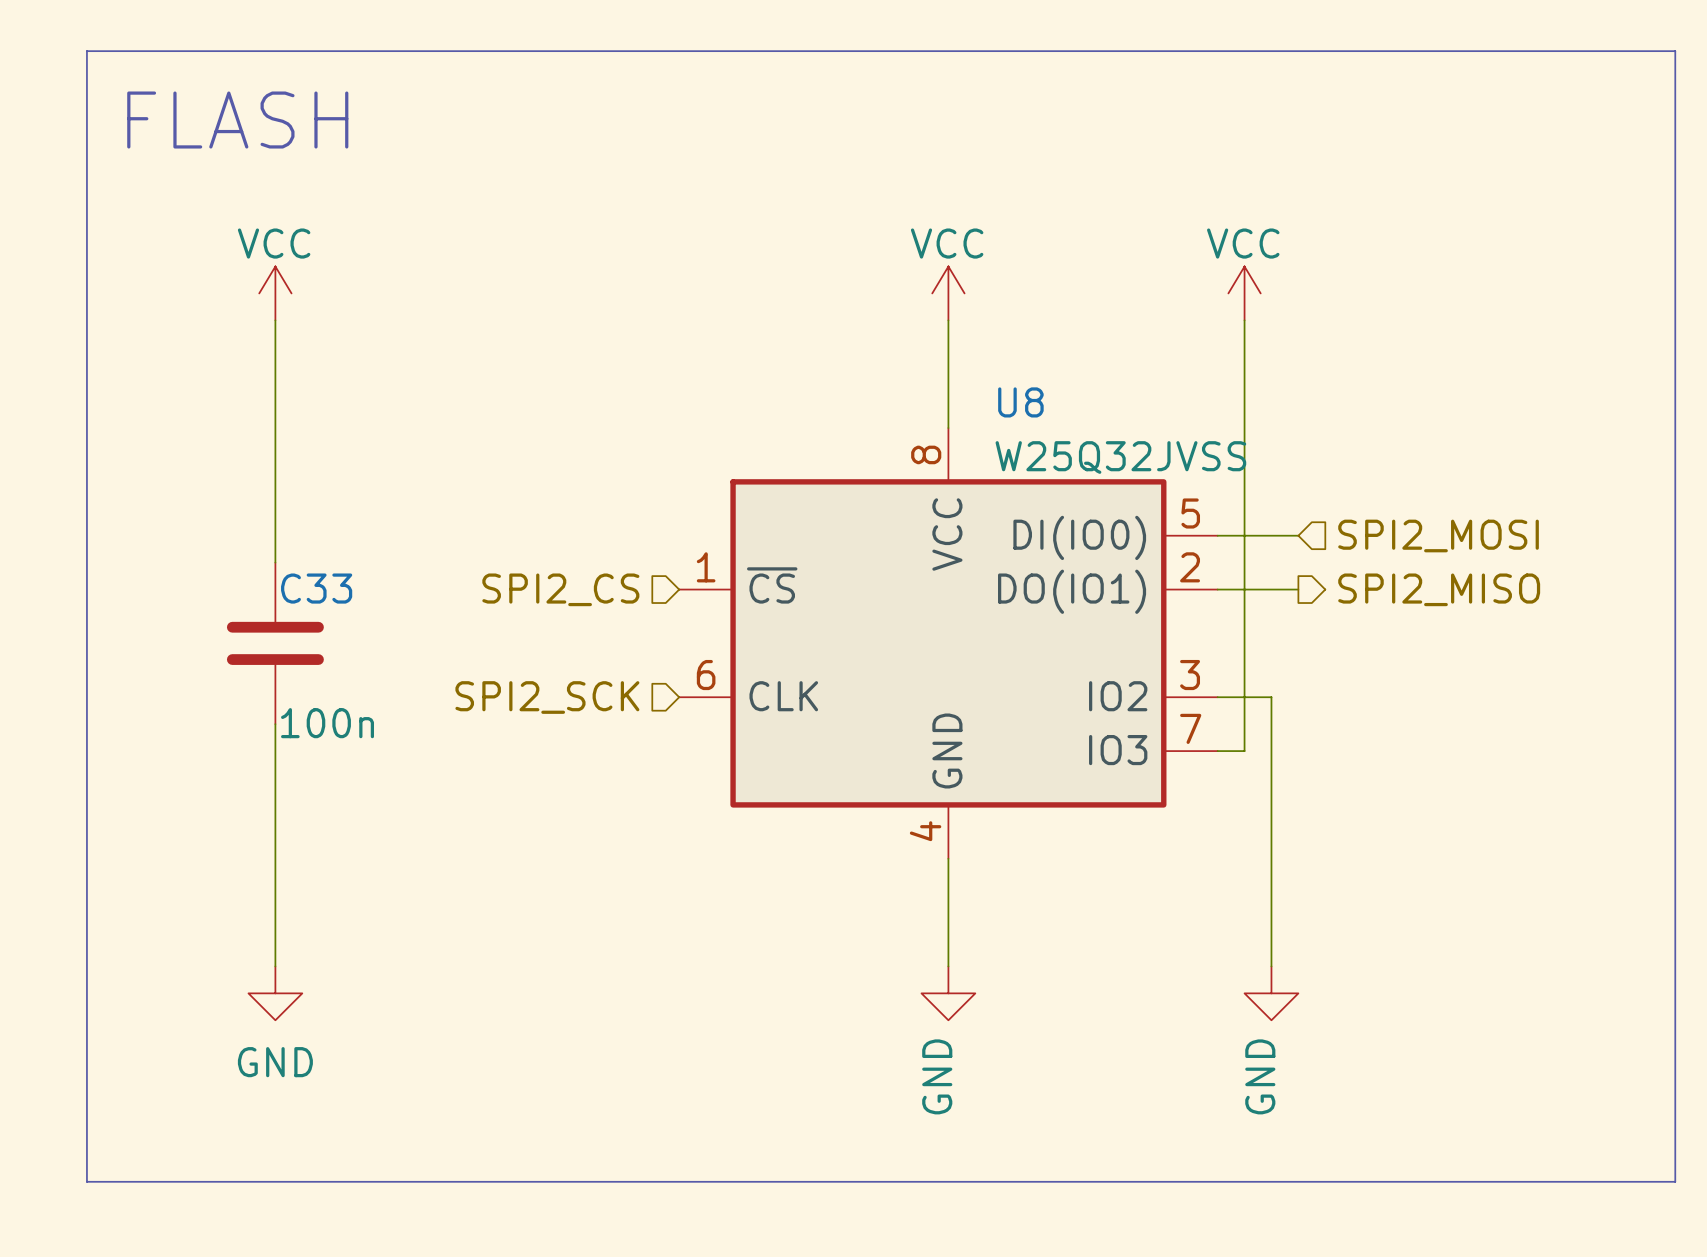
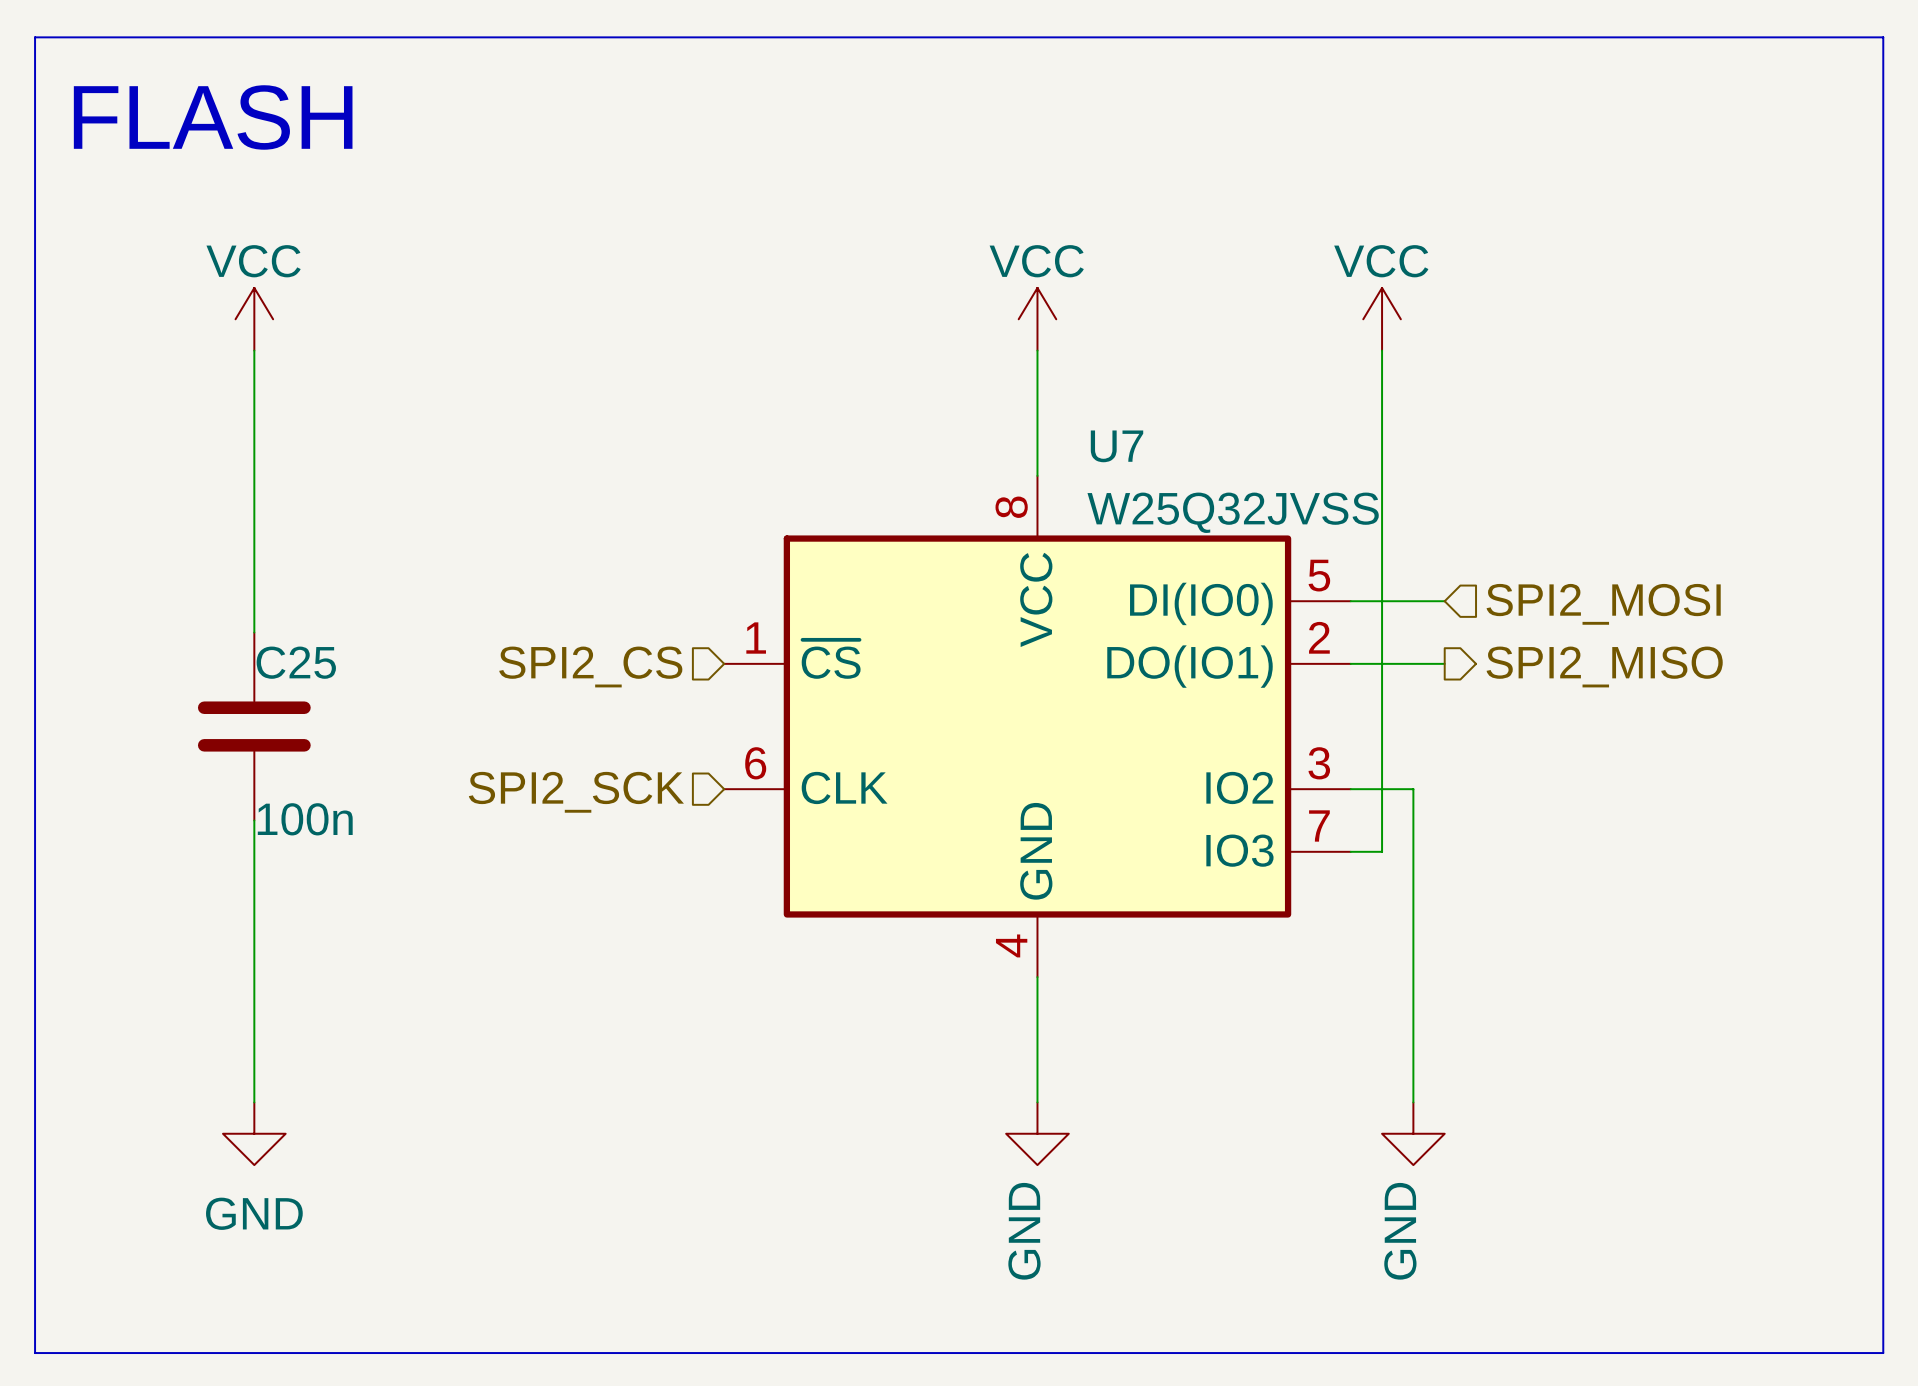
U8 name: U8 (1020, 402) -> U7 (1117, 446)
C33 name: C33 (316, 588) -> C25 (296, 662)

